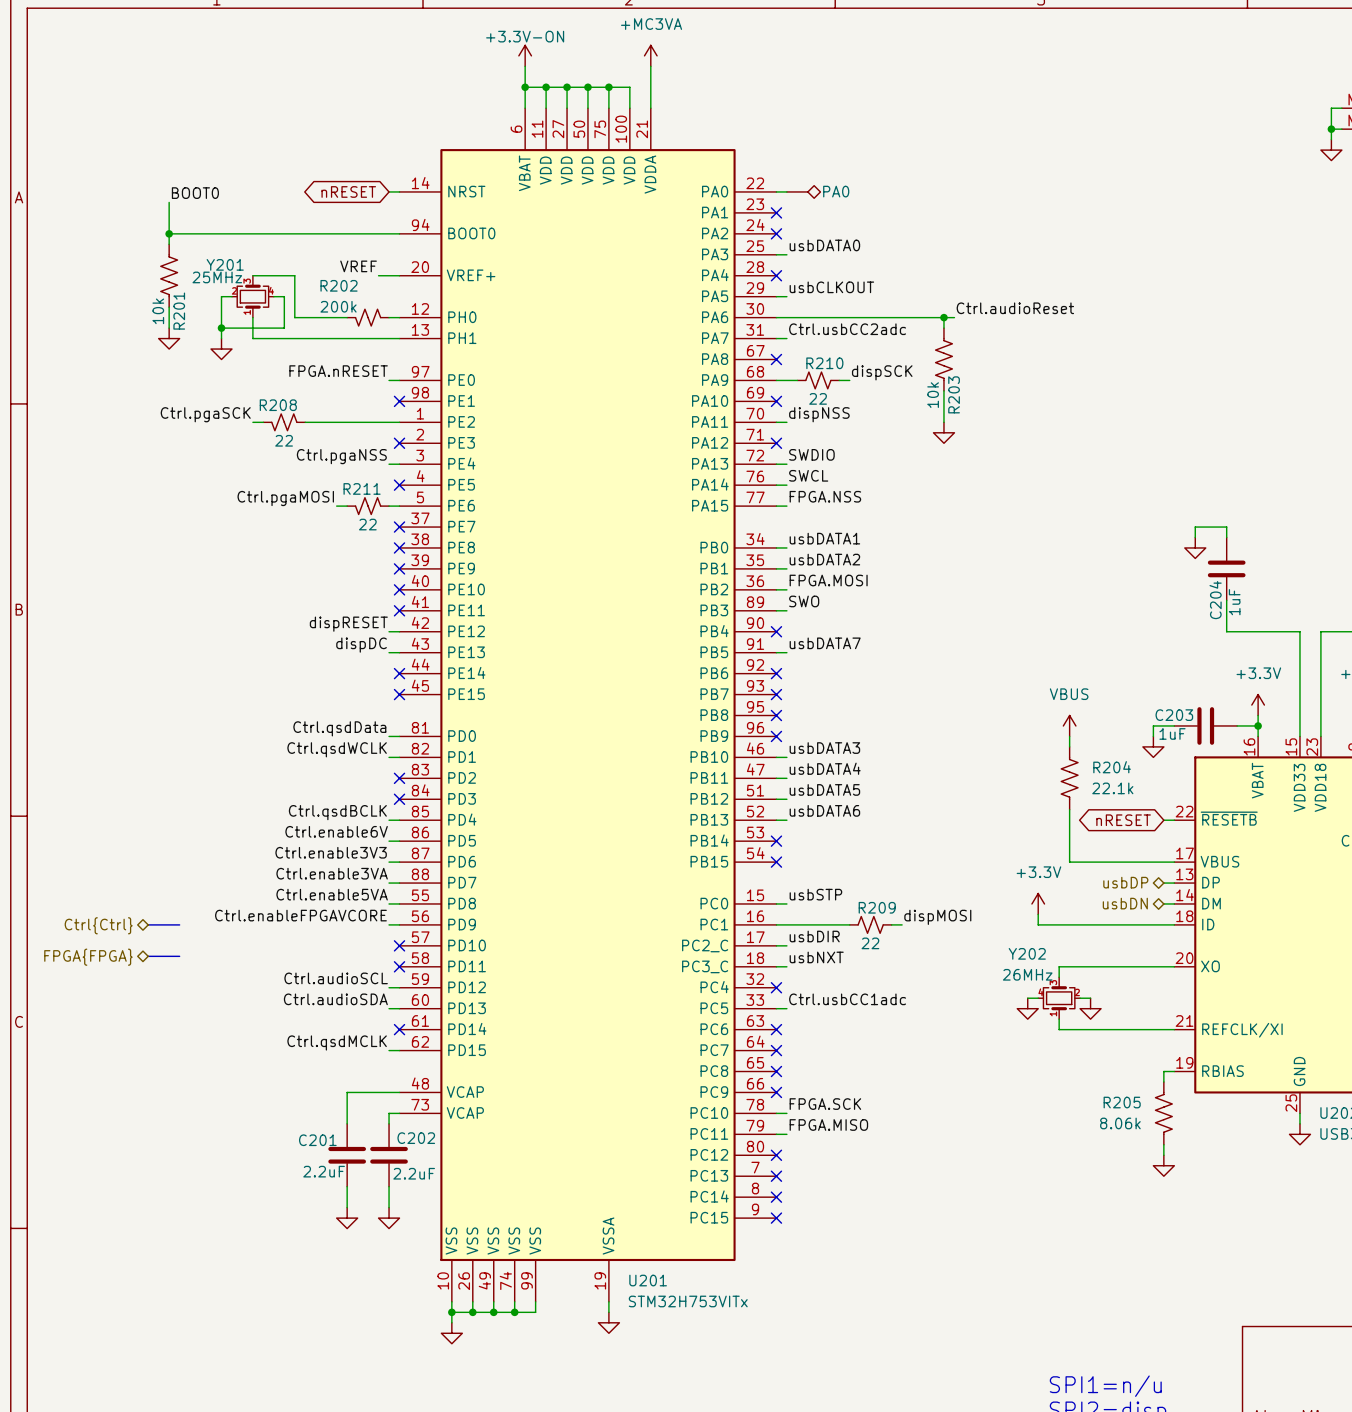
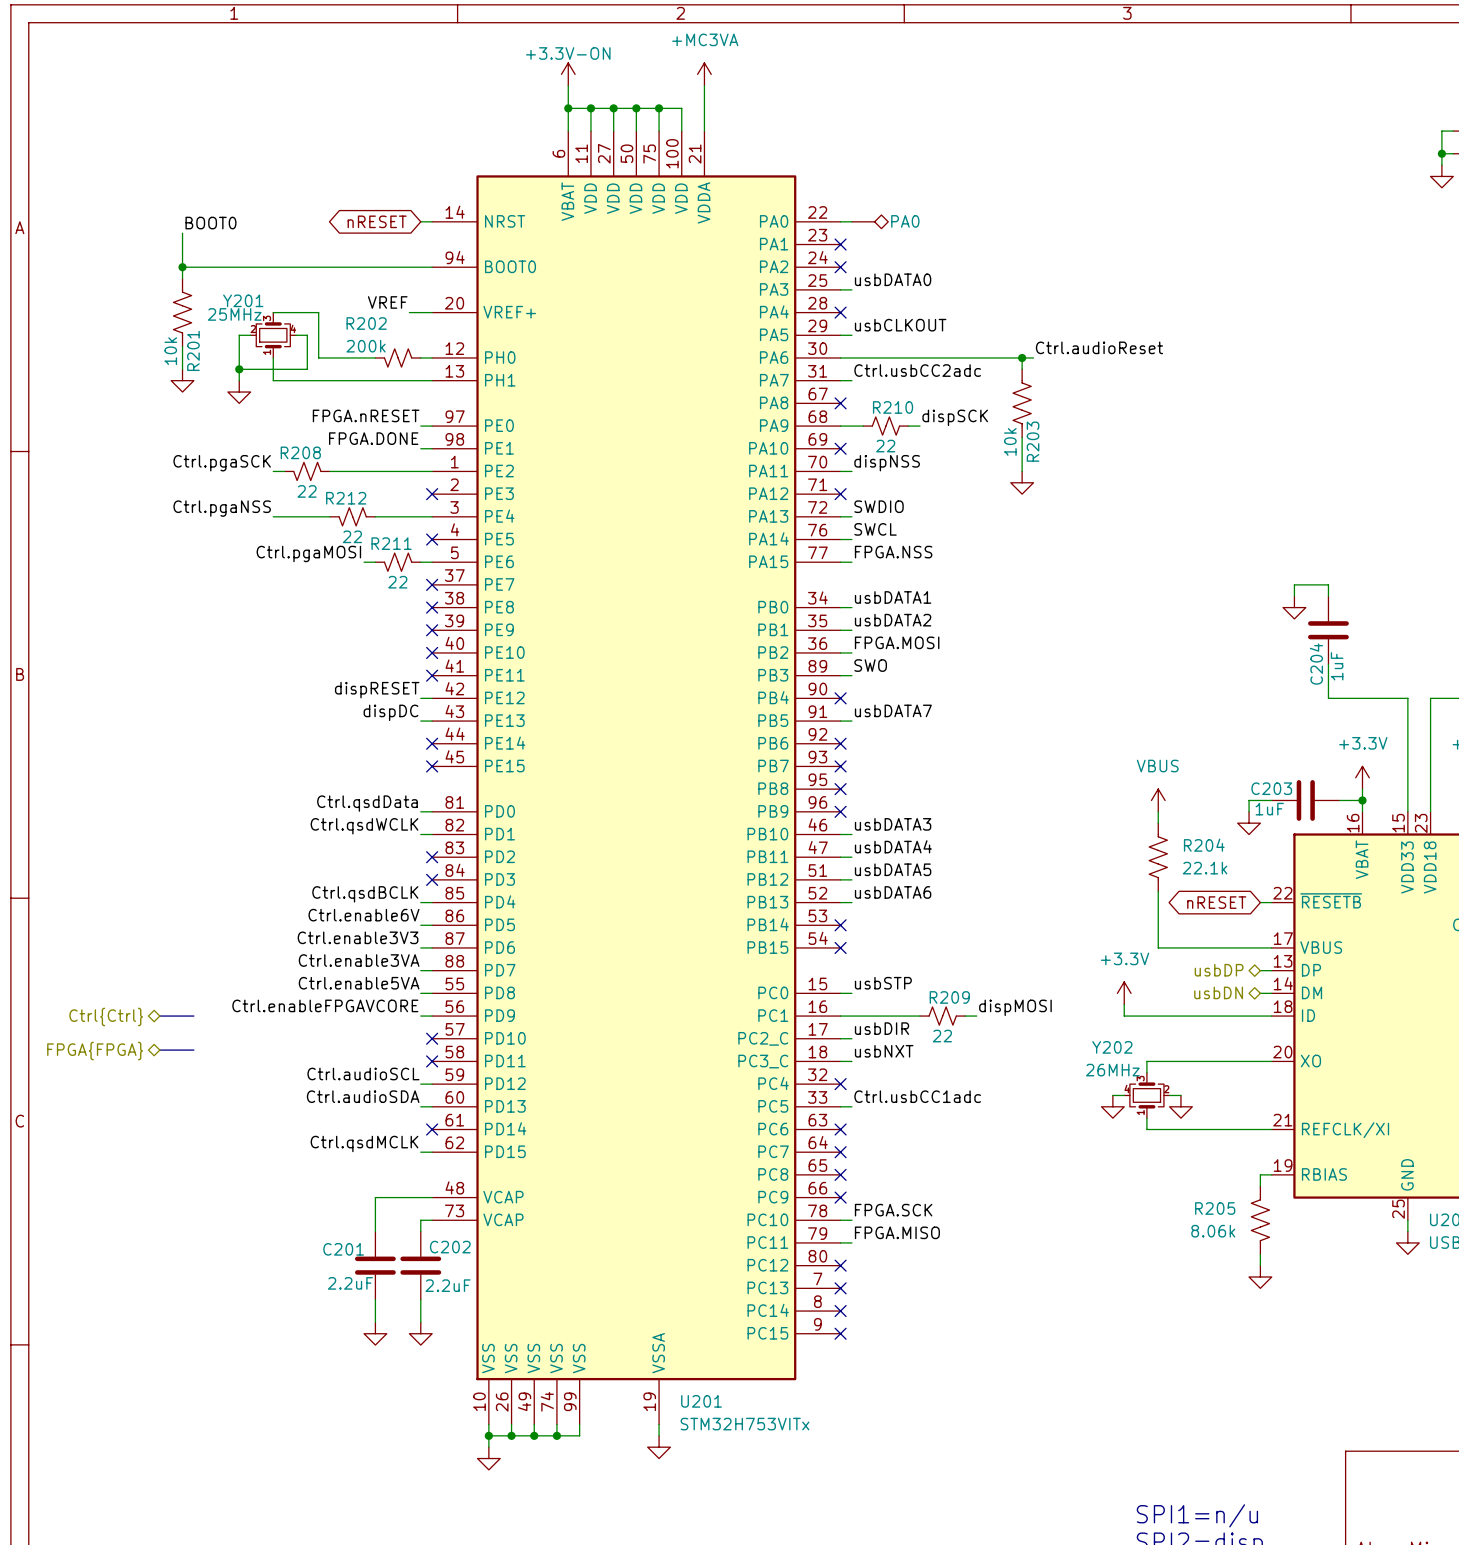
label: none -> FPGA.DONE (373, 438)
wire: none -> (420, 448) (432, 448)
no-connect mark: (399, 401) -> none
label position: Ctrl.pgaNSS (341, 456) -> Ctrl.pgaNSS (222, 508)
wire: none -> (273, 516) (330, 516)
R212: none -> 22 (352, 516)
wire: none -> (375, 516) (420, 516)

